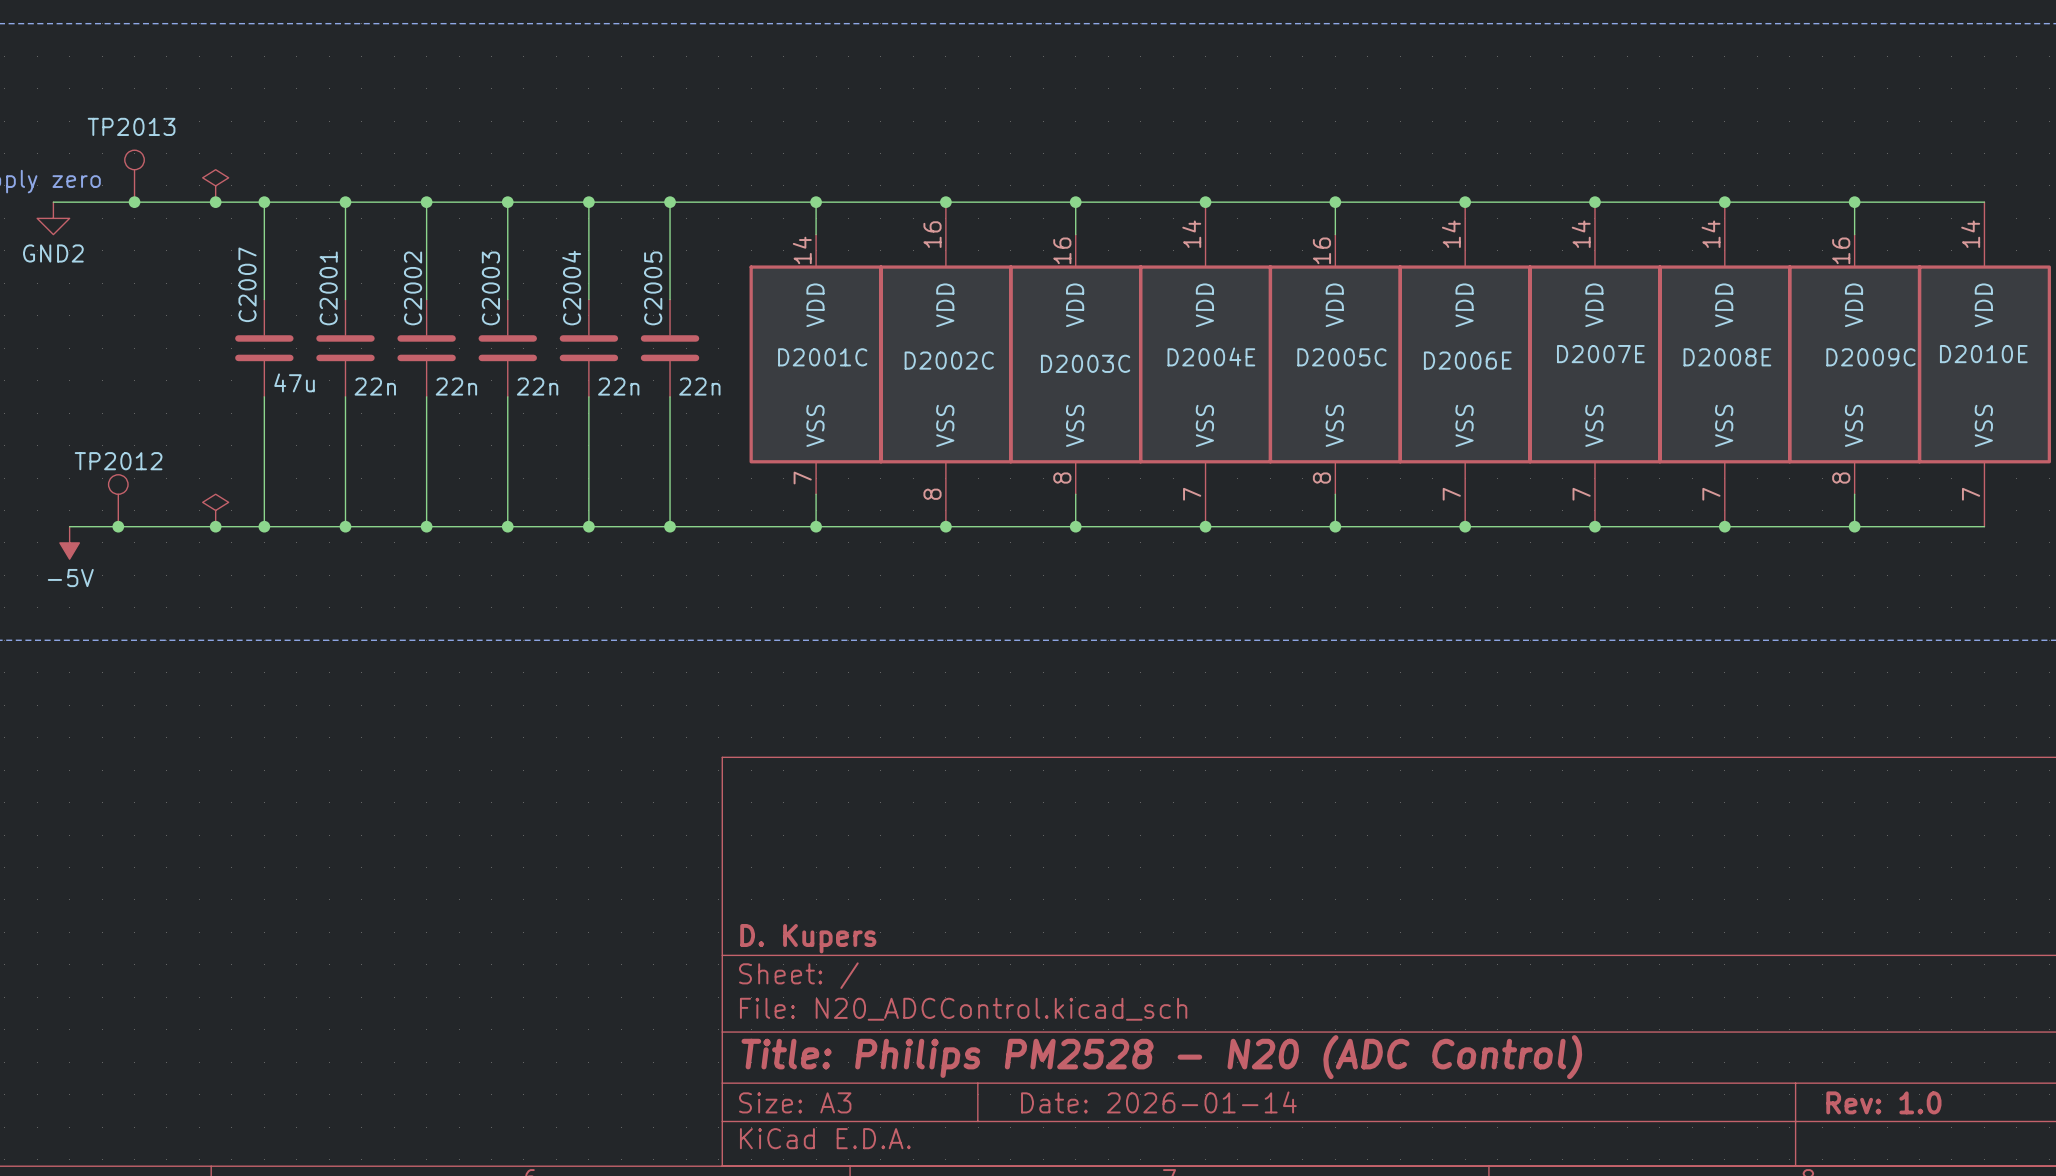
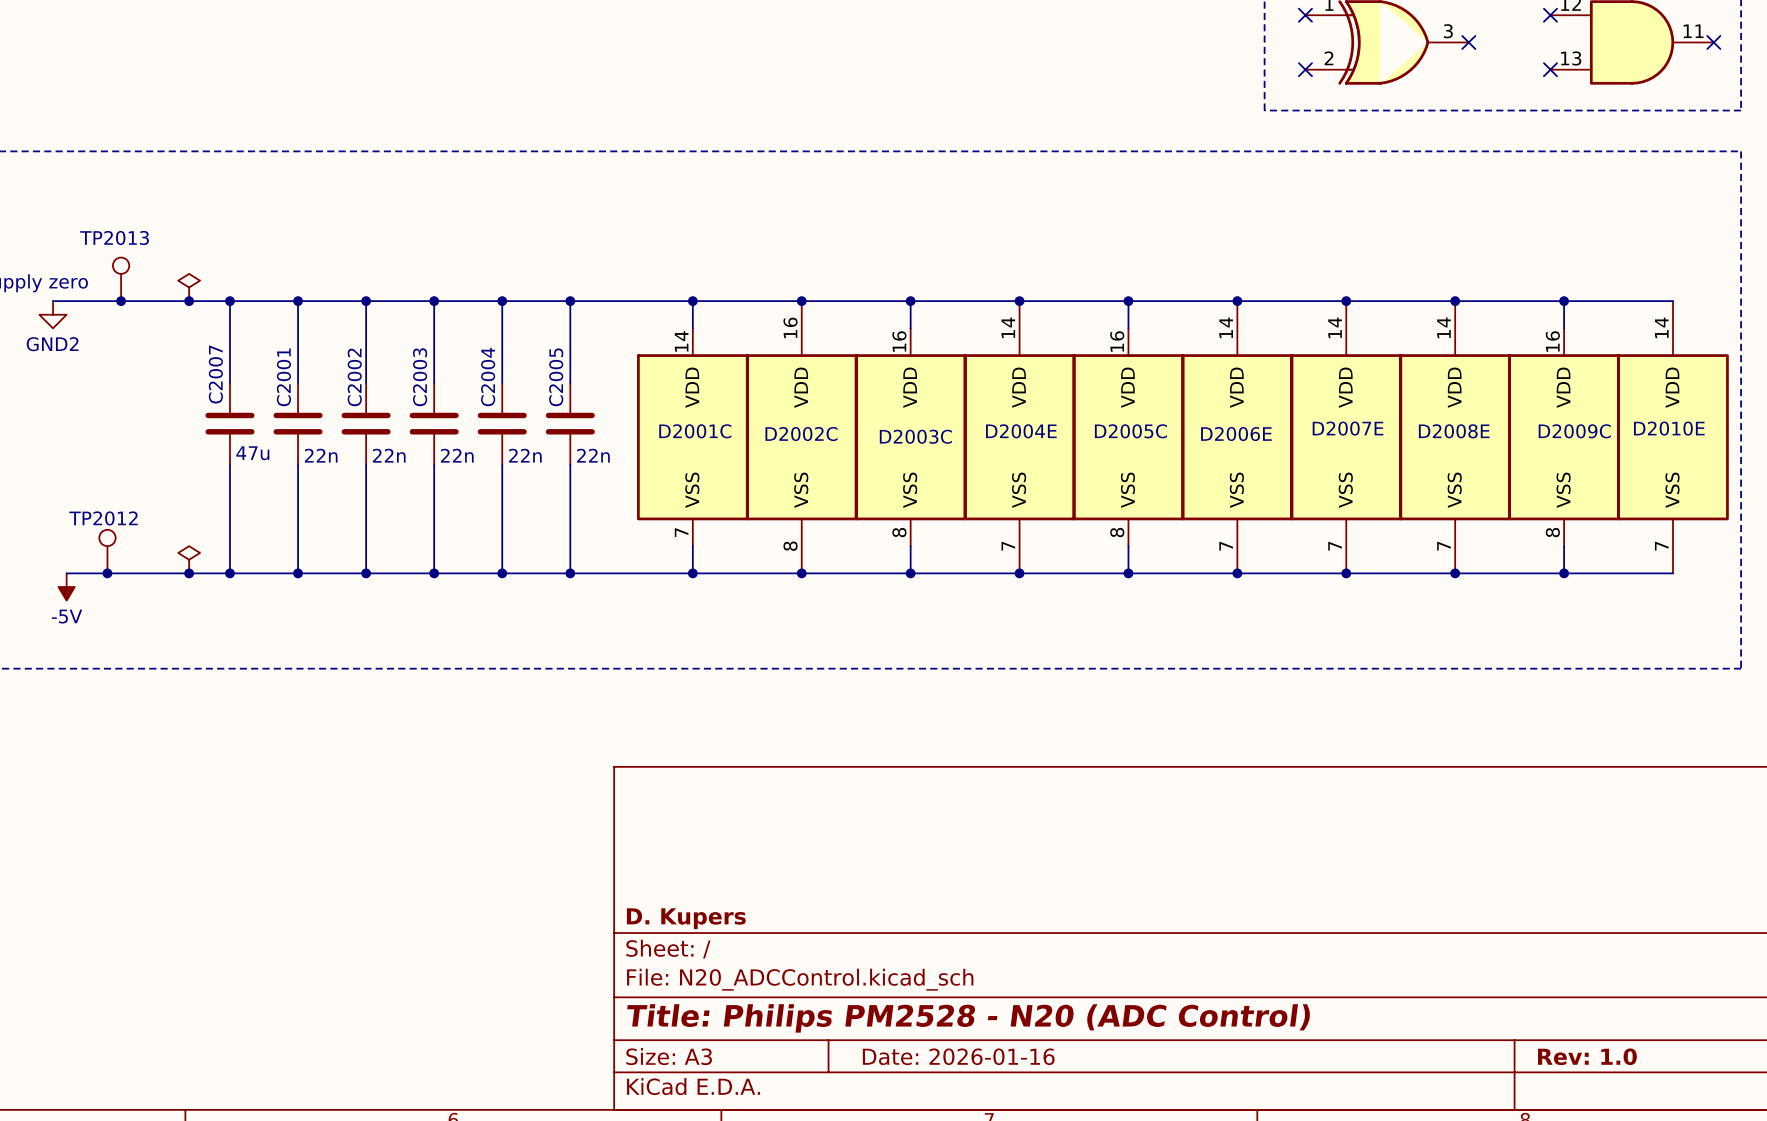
title block: Date: 2026-01-14 (1158, 1102) -> Date: 2026-01-16 (958, 1056)

